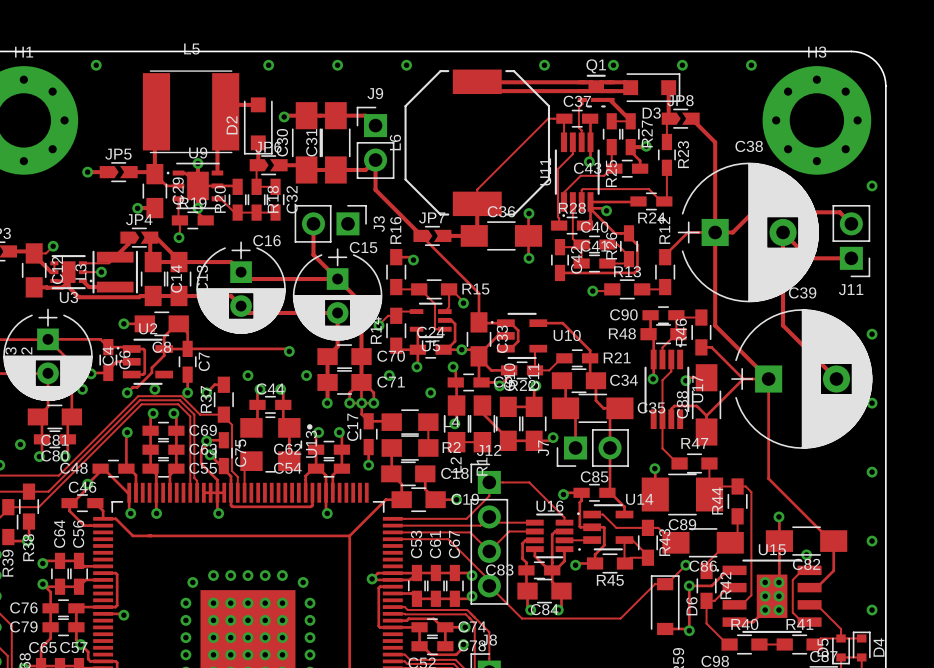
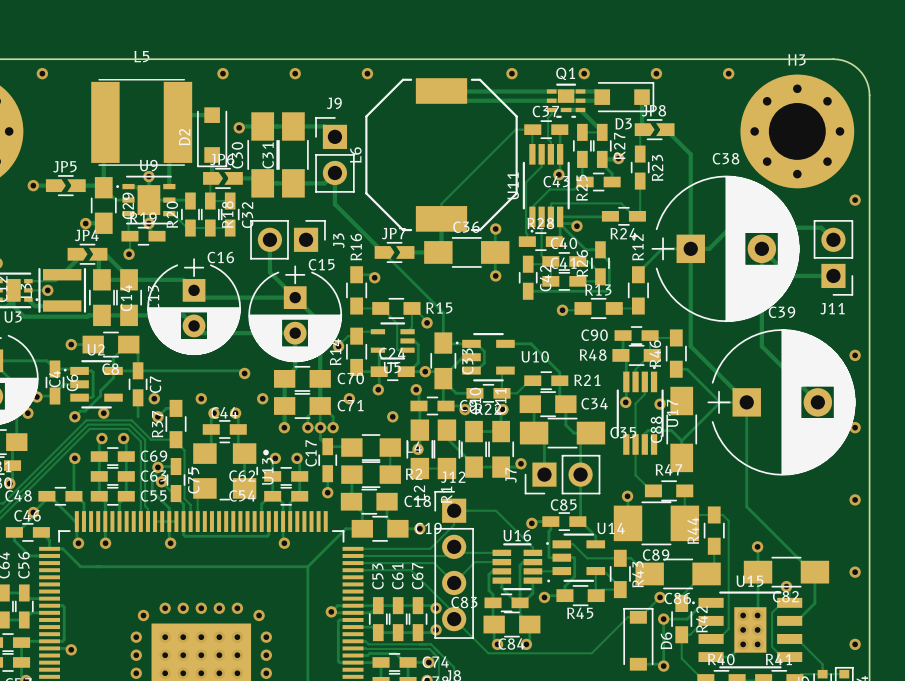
via position: (187, 392) -> (154, 398)

